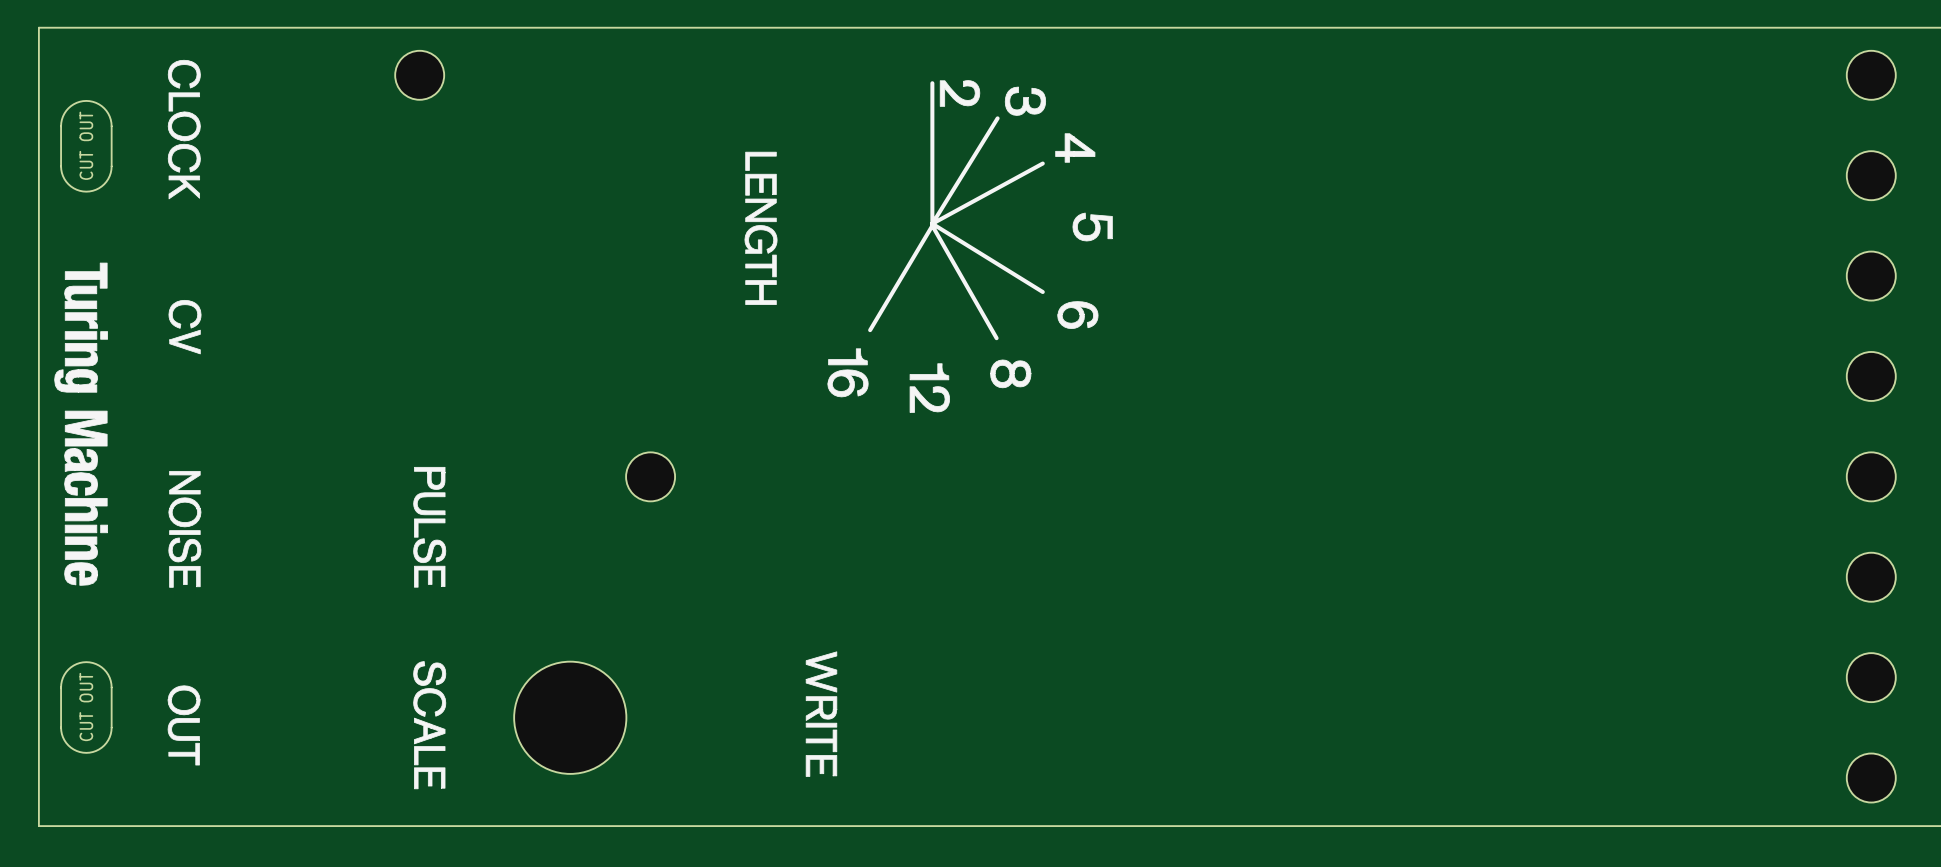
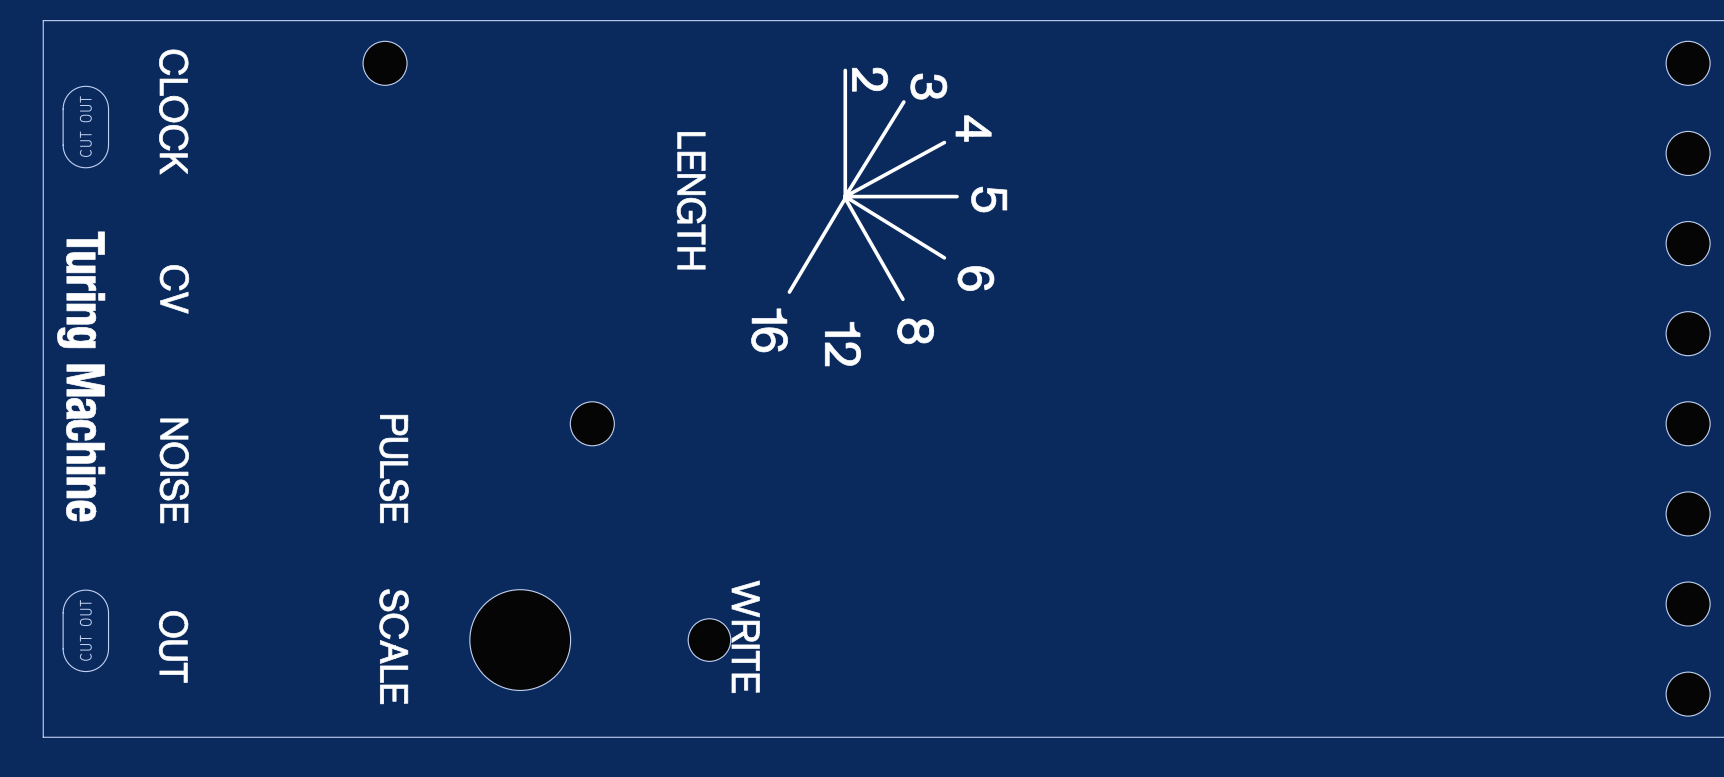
line: none -> (845, 196) (957, 196)
hole: none -> (709, 640)

